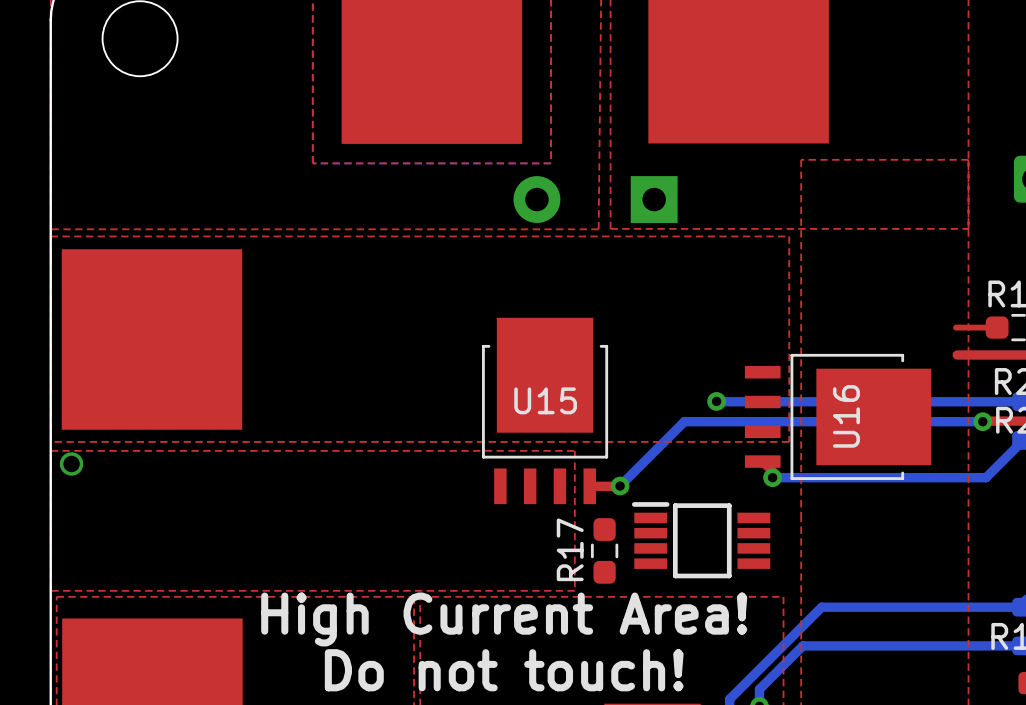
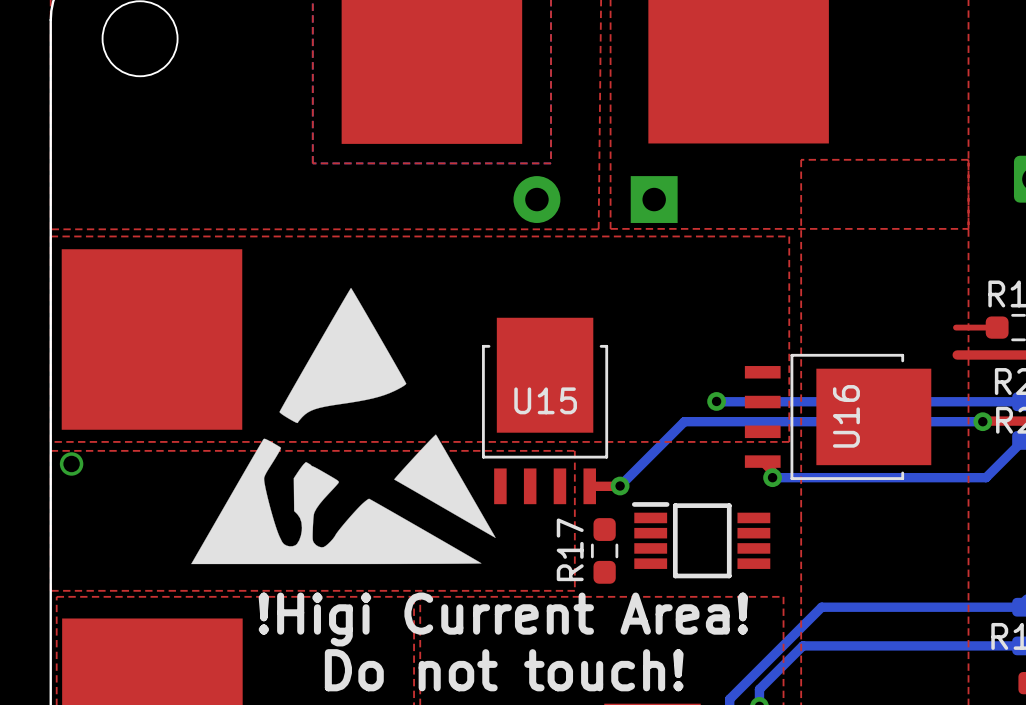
drawing: none -> [191, 287, 496, 565]
text: High Current Area! (504, 619) -> !Higi Current Area! (503, 619)

